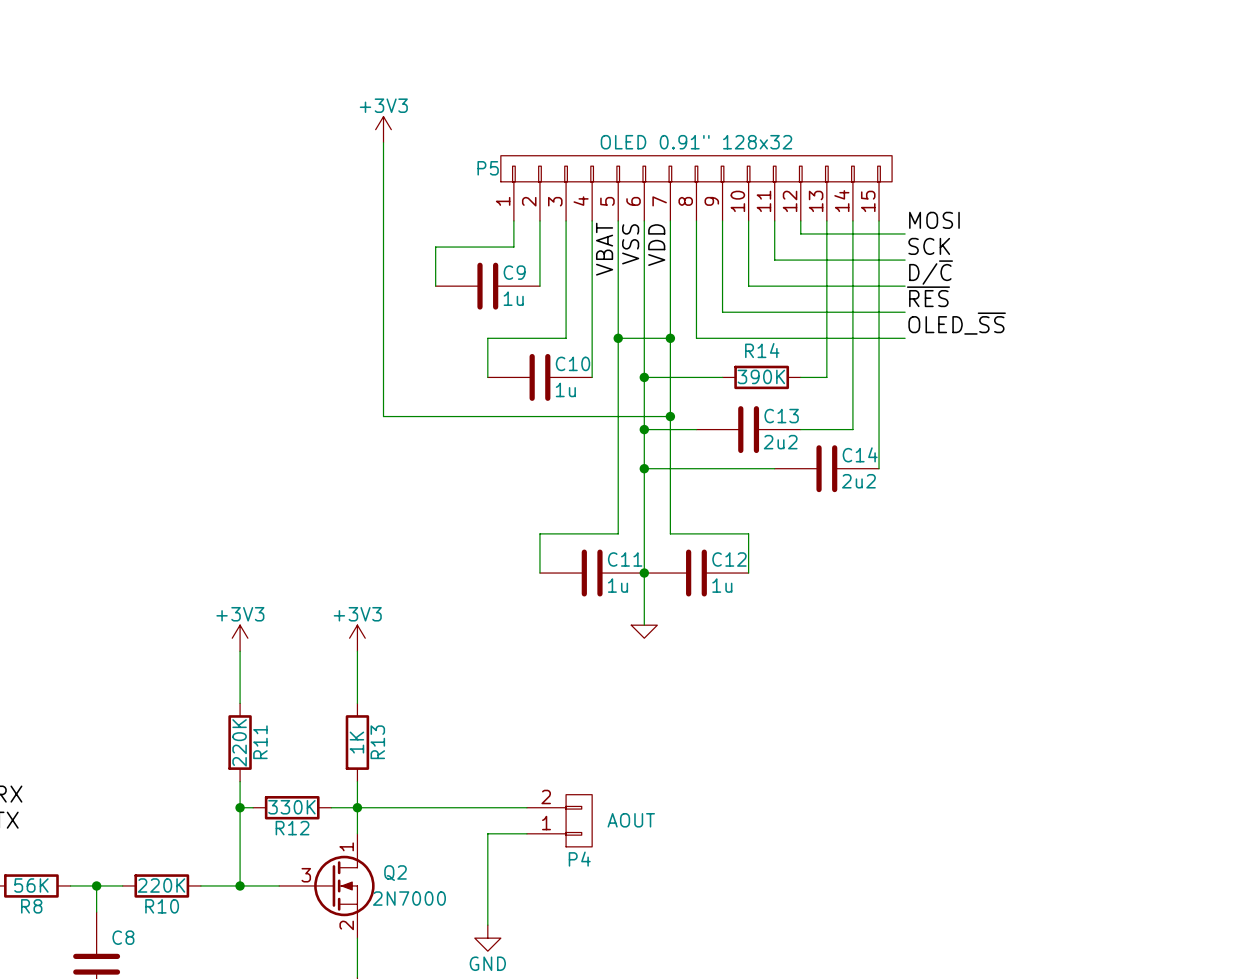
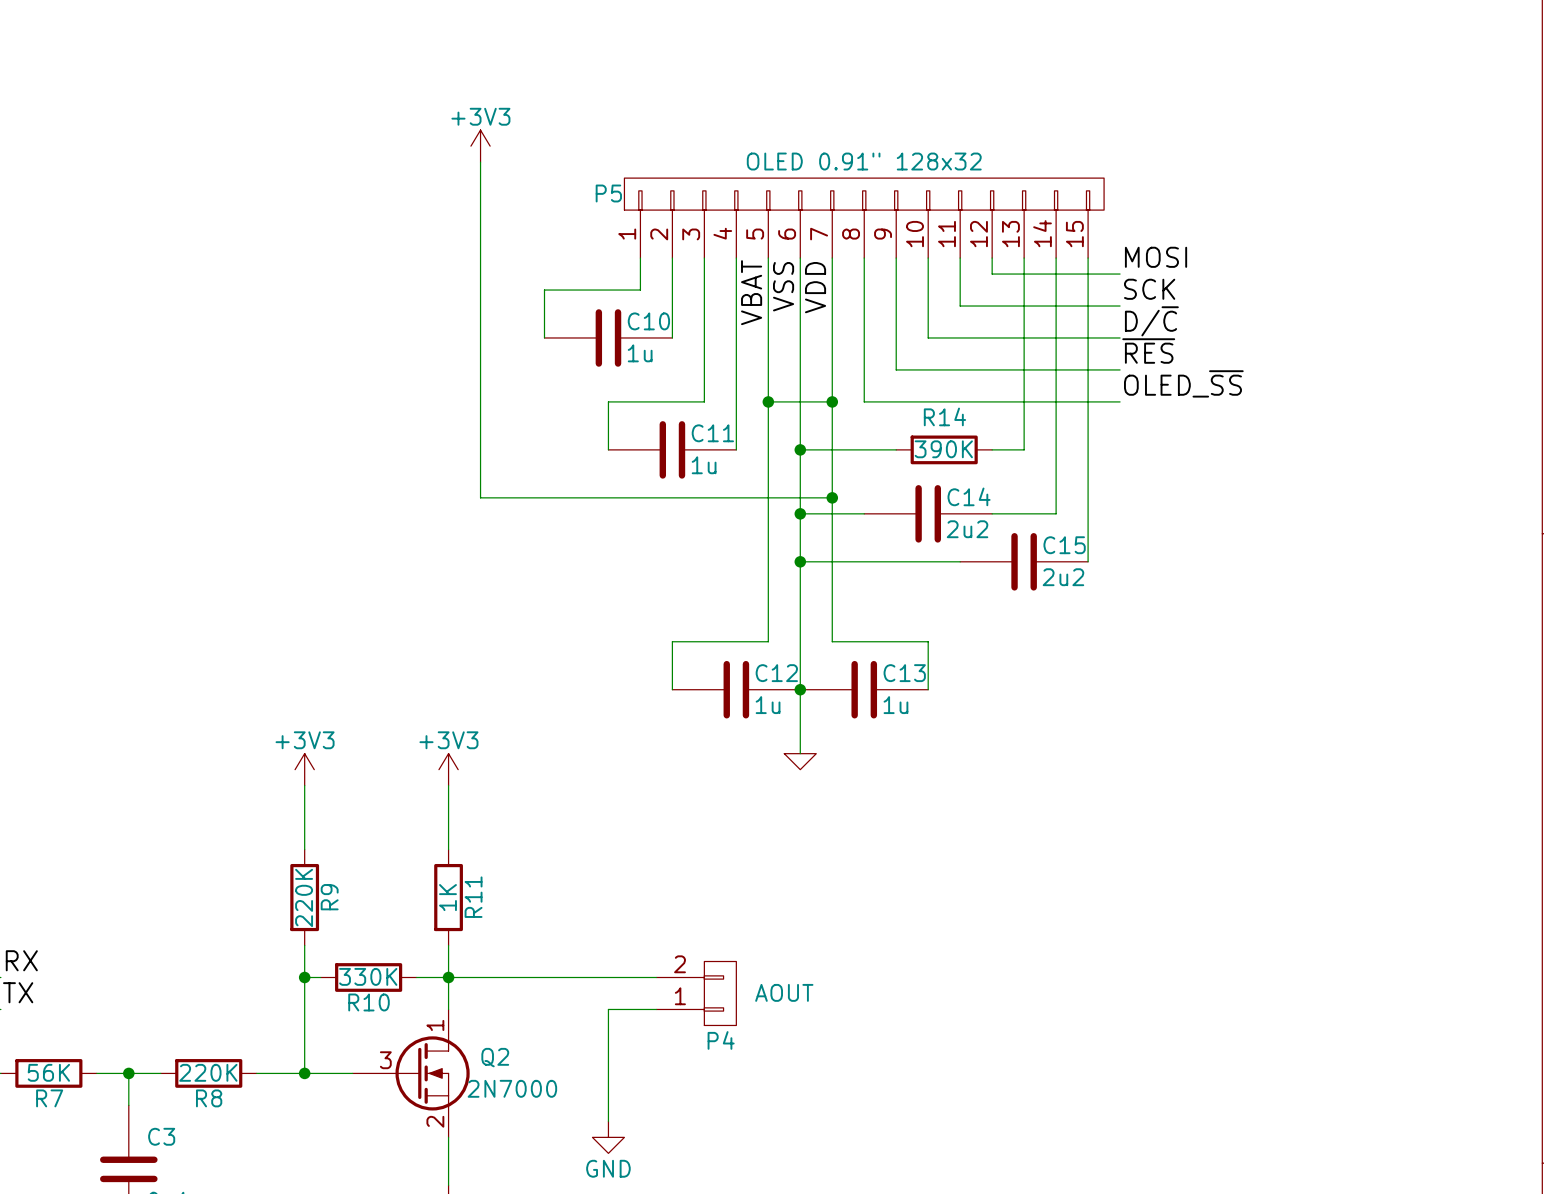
C9 name: C9 (514, 272) -> C10 (648, 321)
C10 name: C10 (572, 363) -> C11 (712, 433)
C13 name: C13 (781, 416) -> C14 (969, 496)
C14 name: C14 (860, 454) -> C15 (1064, 545)
C11 name: C11 (625, 559) -> C12 (776, 673)
C12 name: C12 (729, 559) -> C13 (904, 673)
R11 name: R11 (260, 742) -> R9 (329, 897)
R13 name: R13 (377, 742) -> R11 (473, 897)
R12 name: R12 (292, 828) -> R10 (369, 1002)
R8 name: R8 (31, 906) -> R7 (49, 1098)
R10 name: R10 (162, 906) -> R8 (209, 1098)
C8 name: C8 (123, 937) -> C3 (161, 1136)

